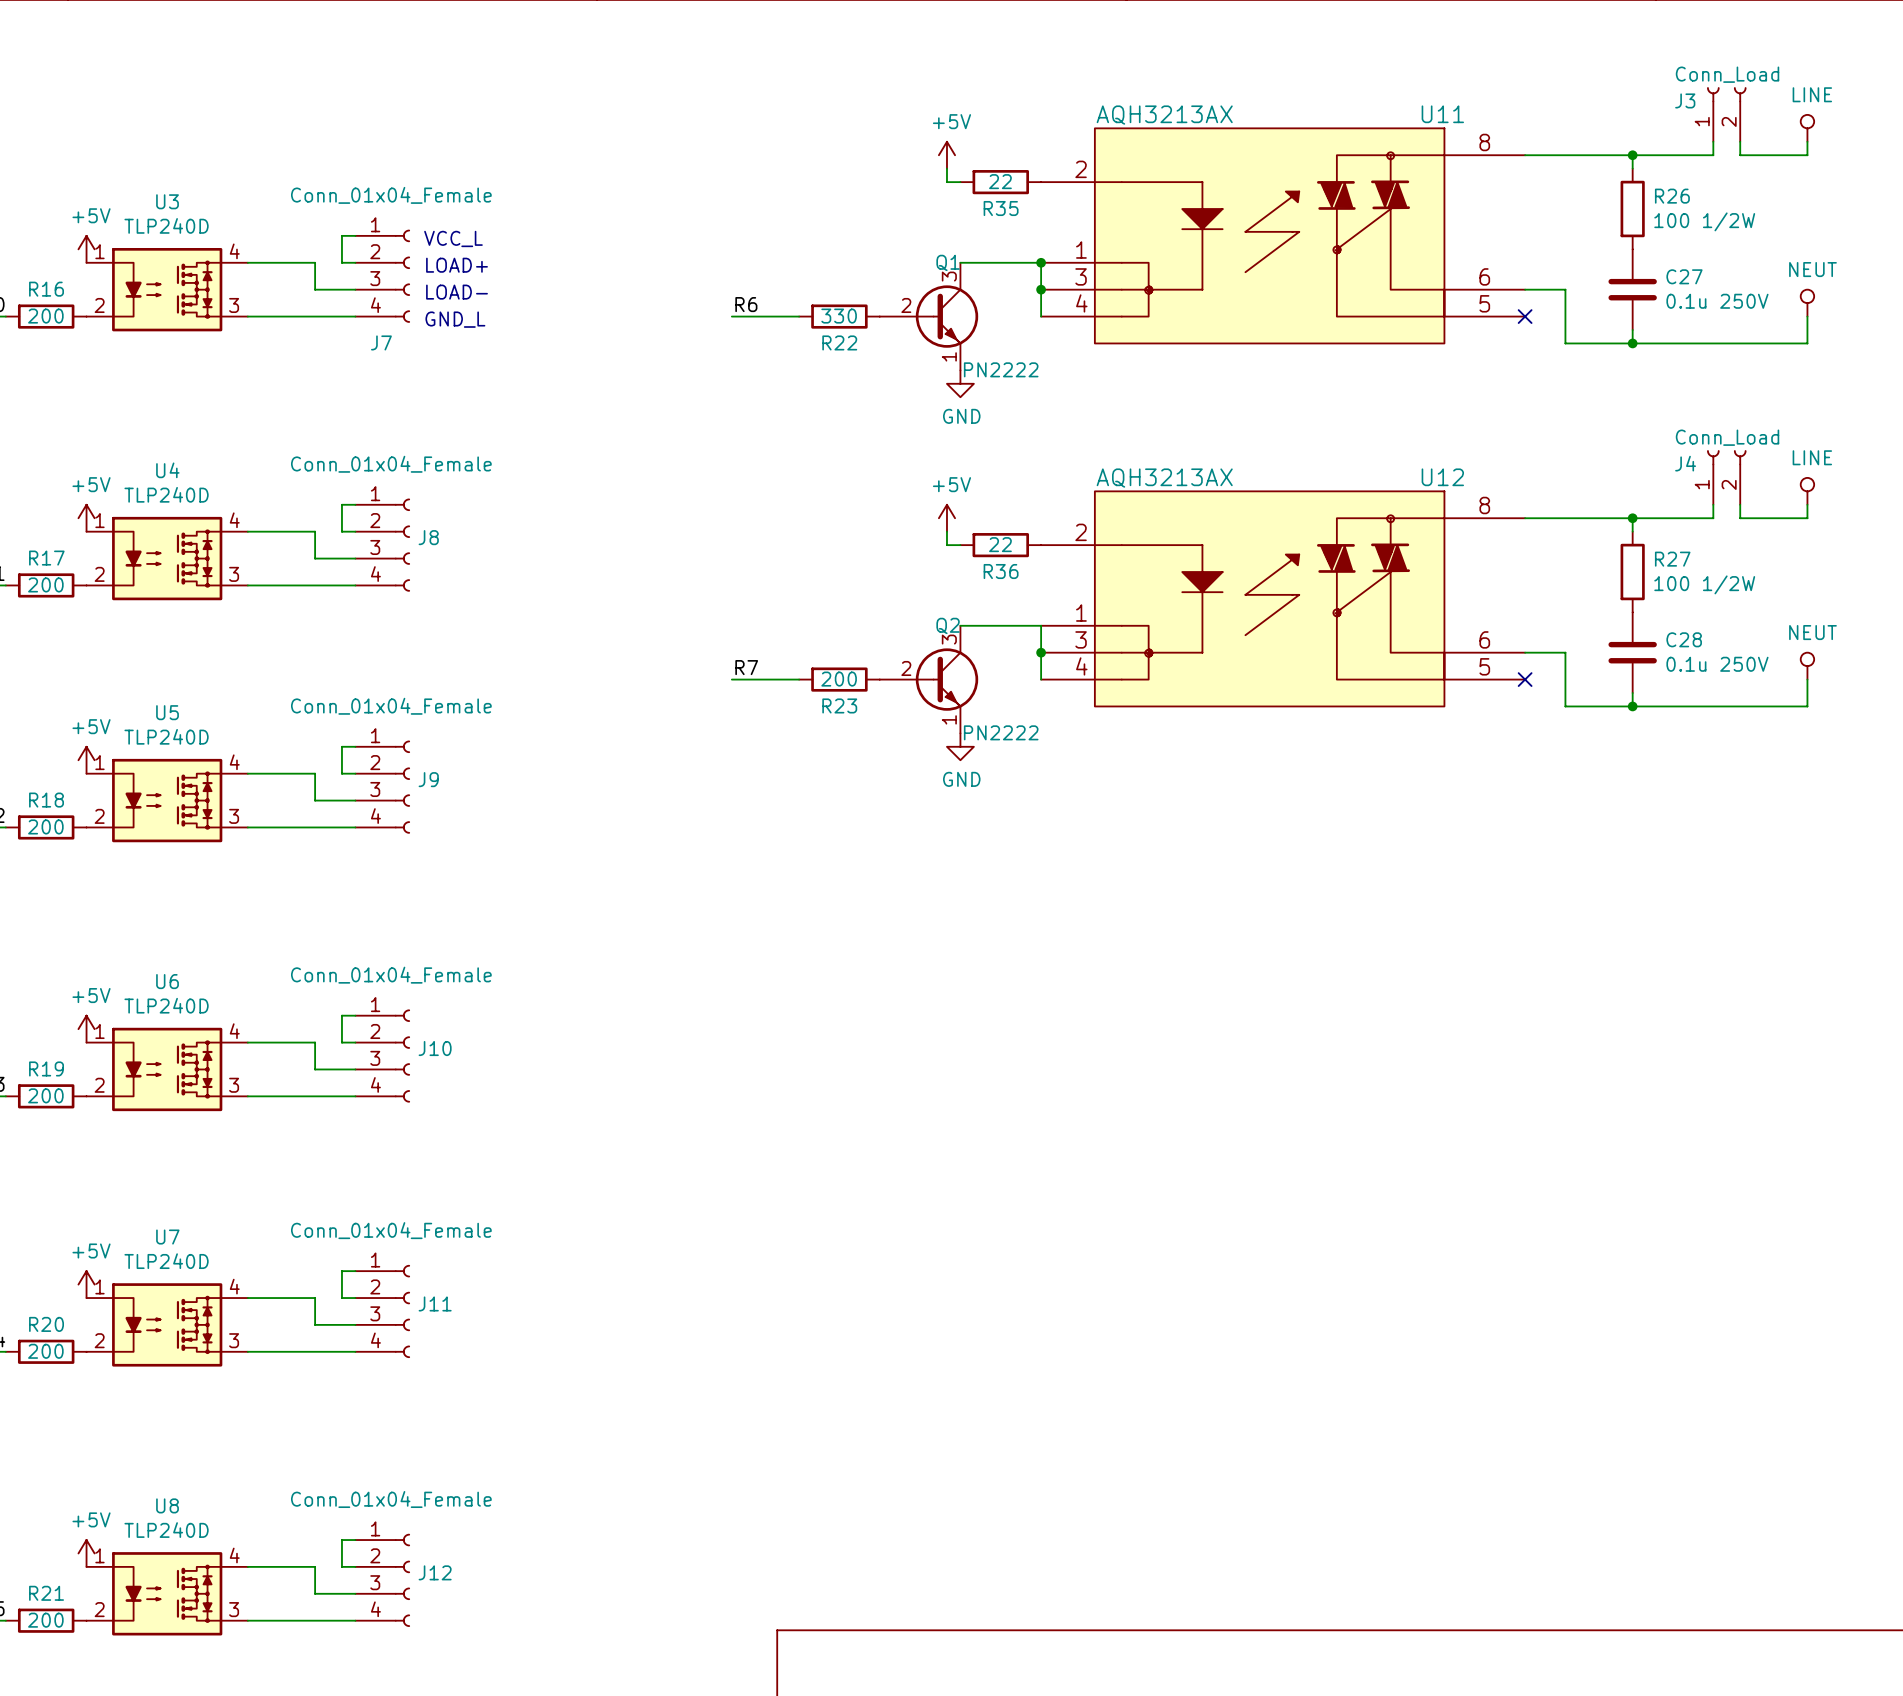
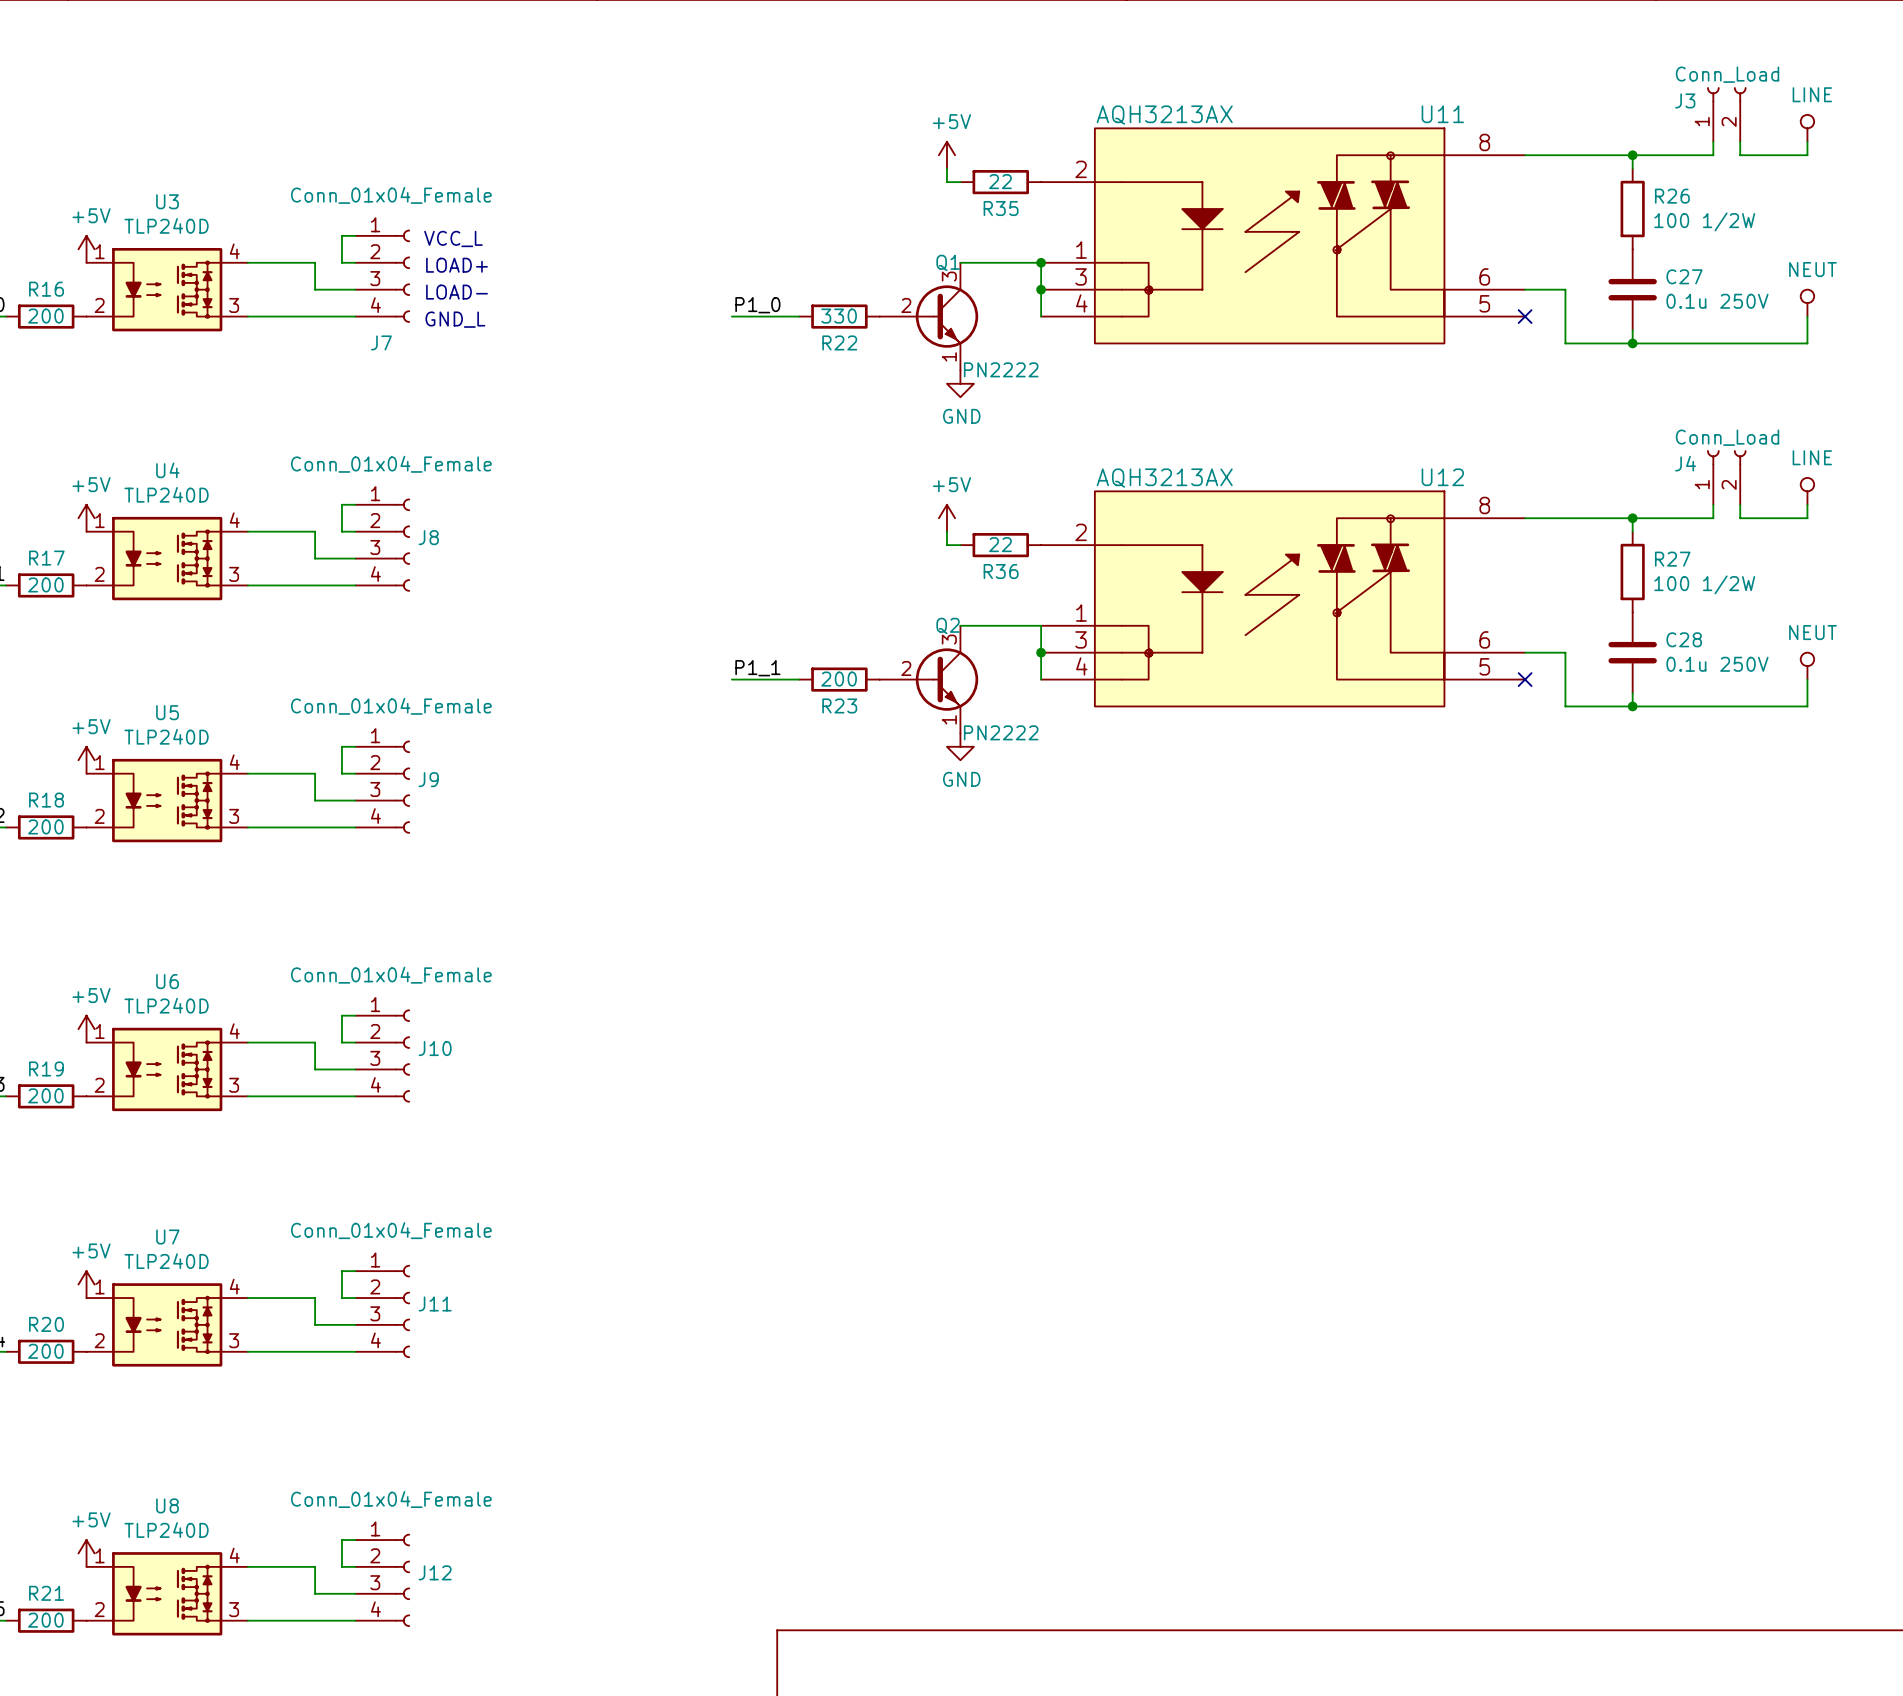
label: R6 (746, 304) -> P1_0 (757, 305)
label: R7 (746, 667) -> P1_1 (757, 668)

